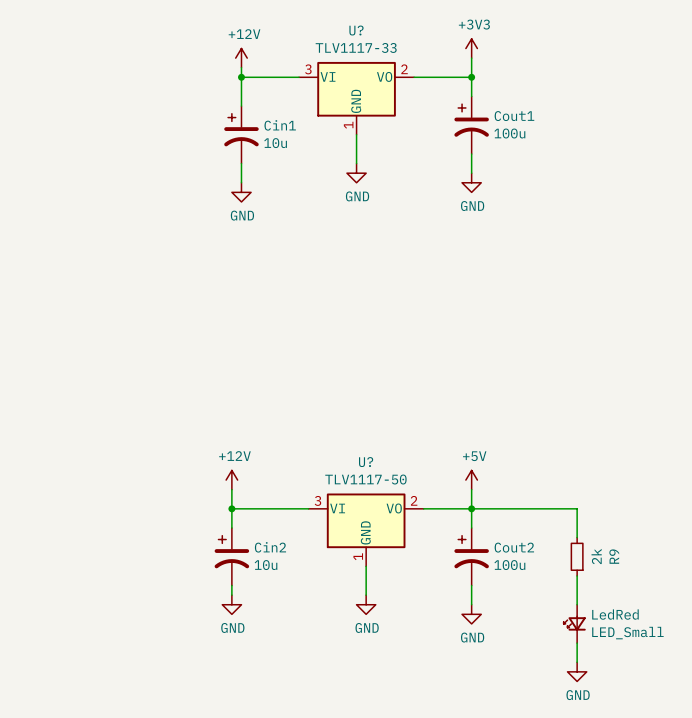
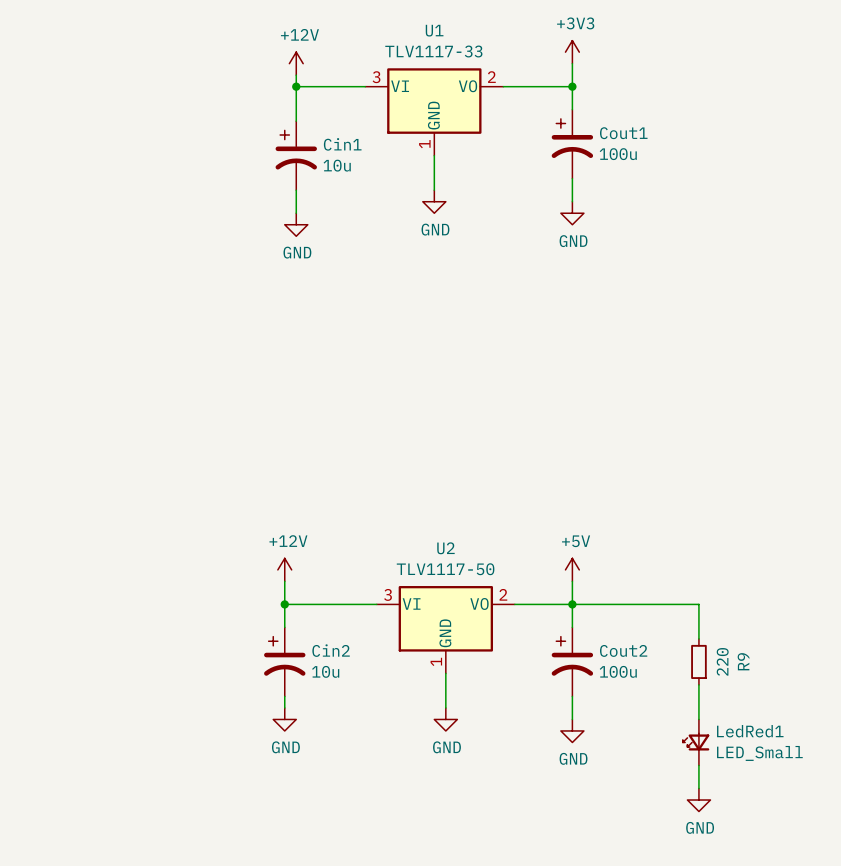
U? name: U? (356, 30) -> U1 (434, 30)
U? name: U? (366, 462) -> U2 (445, 548)
R9 value: 2k (596, 556) -> 220 (722, 661)
LedRed name: LedRed (615, 614) -> LedRed1 (750, 731)

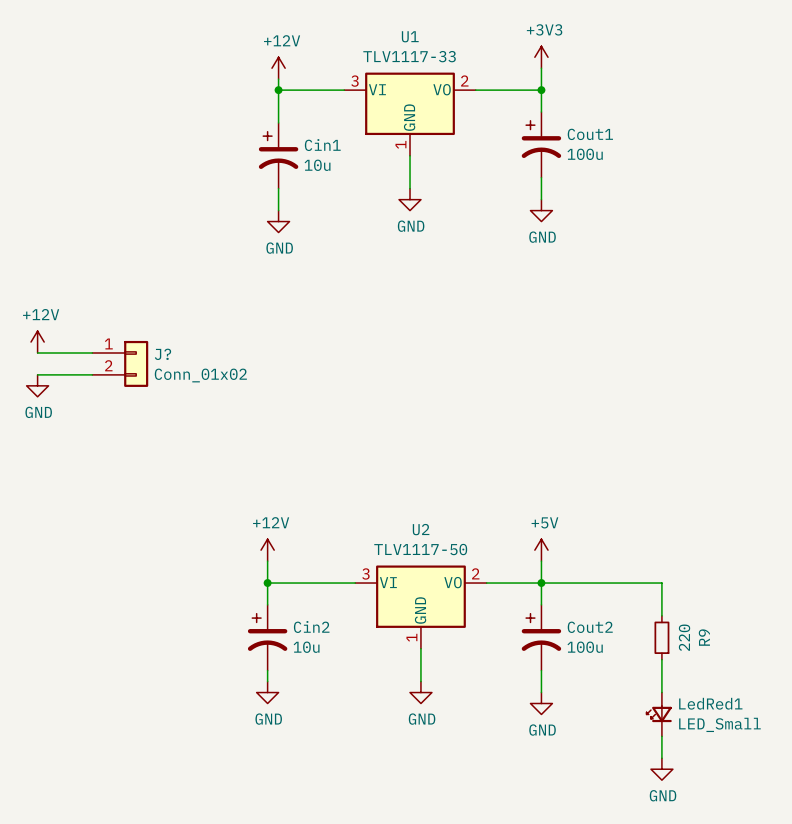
power symbol: none -> +12V (37, 342)
wire: none -> (37, 352) (92, 352)
J?: none -> Conn_01x02 (120, 363)
wire: none -> (37, 374) (92, 374)
power symbol: none -> GND (37, 385)

